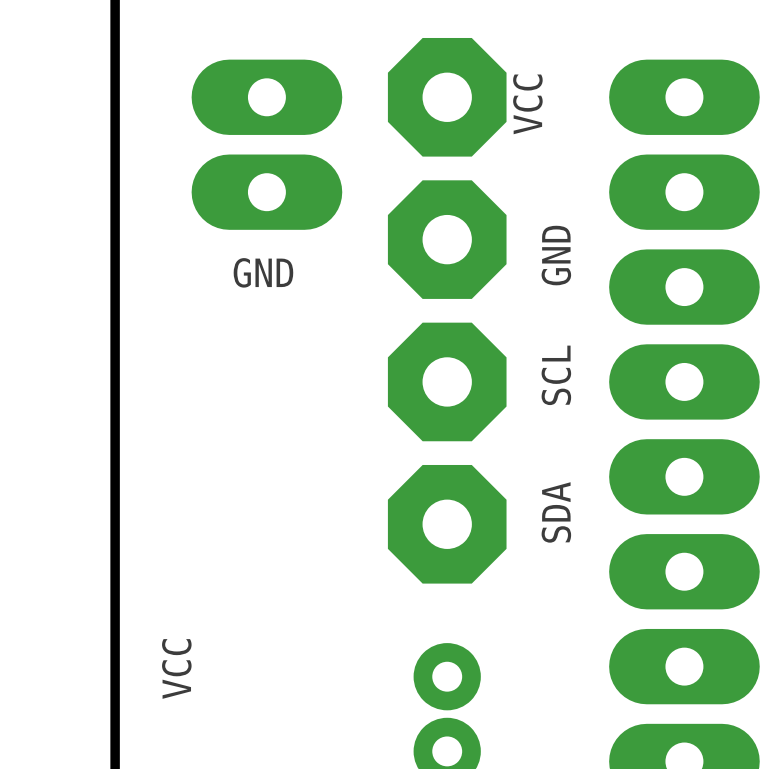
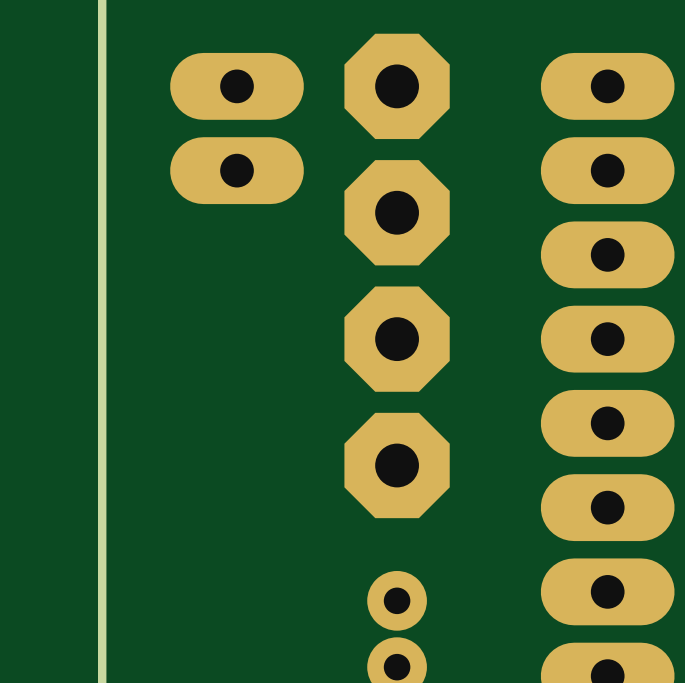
text: VCC (527, 104) -> none
text: GND (556, 255) -> none
text: GND (263, 272) -> none
text: SCL (556, 375) -> none
text: SDA (556, 512) -> none
text: VCC (176, 668) -> none

